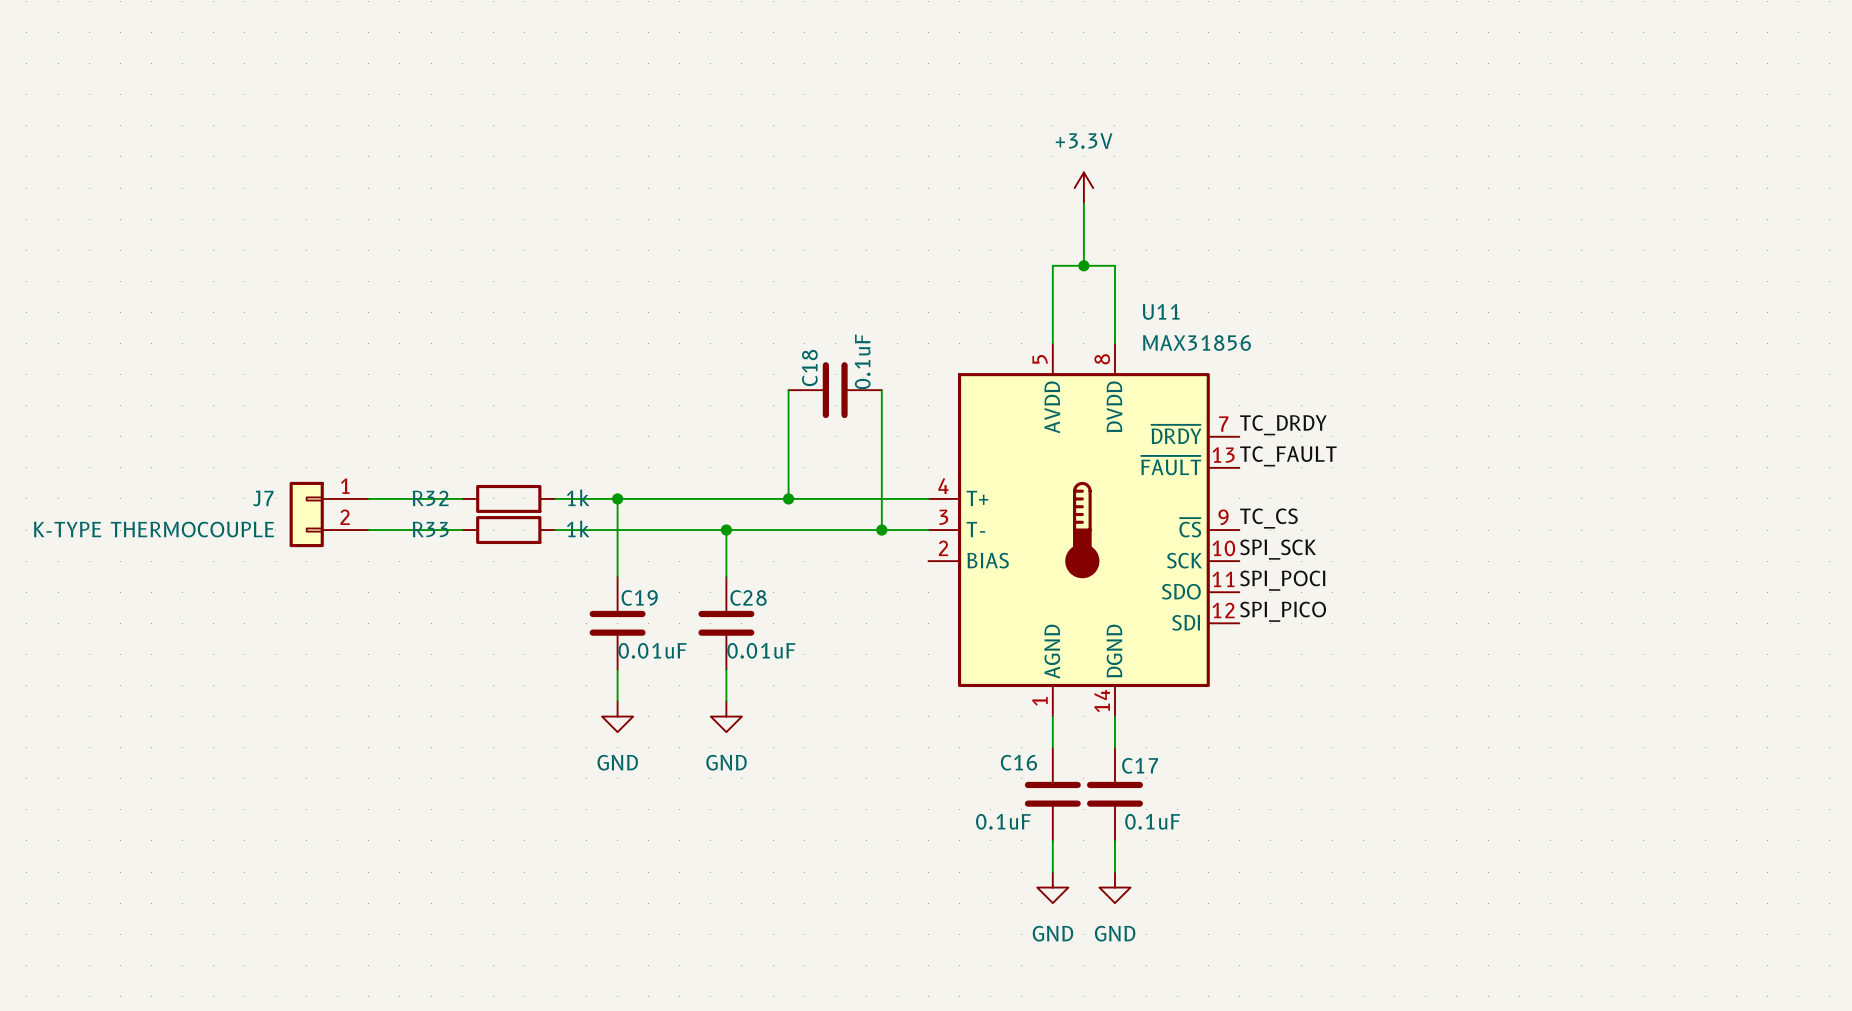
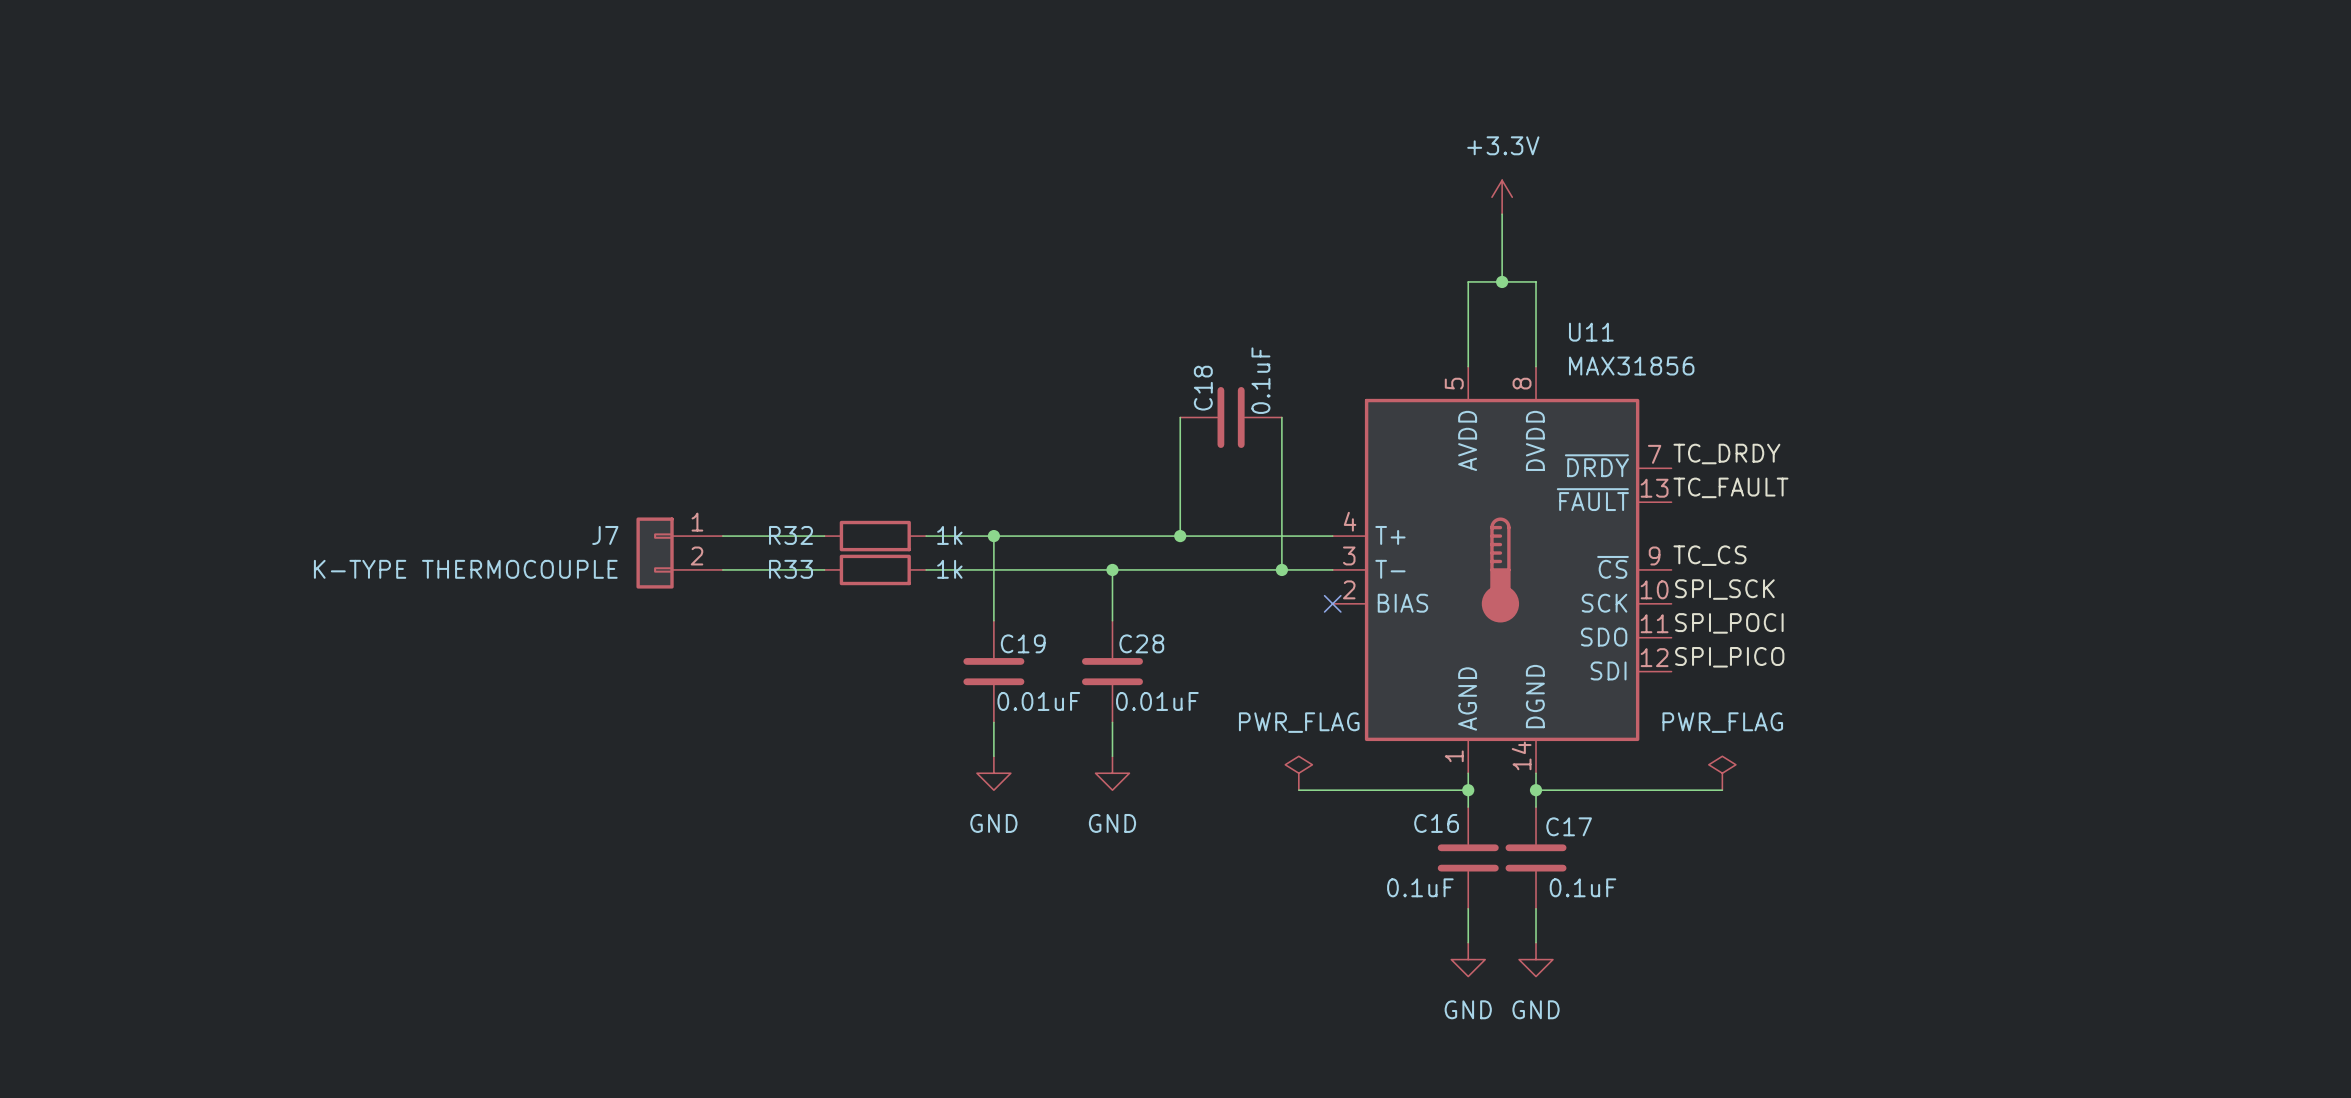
no-connect mark: none -> (1332, 603)
power symbol: none -> PWR_FLAG (1298, 773)
power symbol: none -> PWR_FLAG (1722, 773)
wire: none -> (1298, 790) (1468, 790)
junction: none -> (1468, 790)
wire: none -> (1536, 790) (1722, 790)
junction: none -> (1536, 790)

